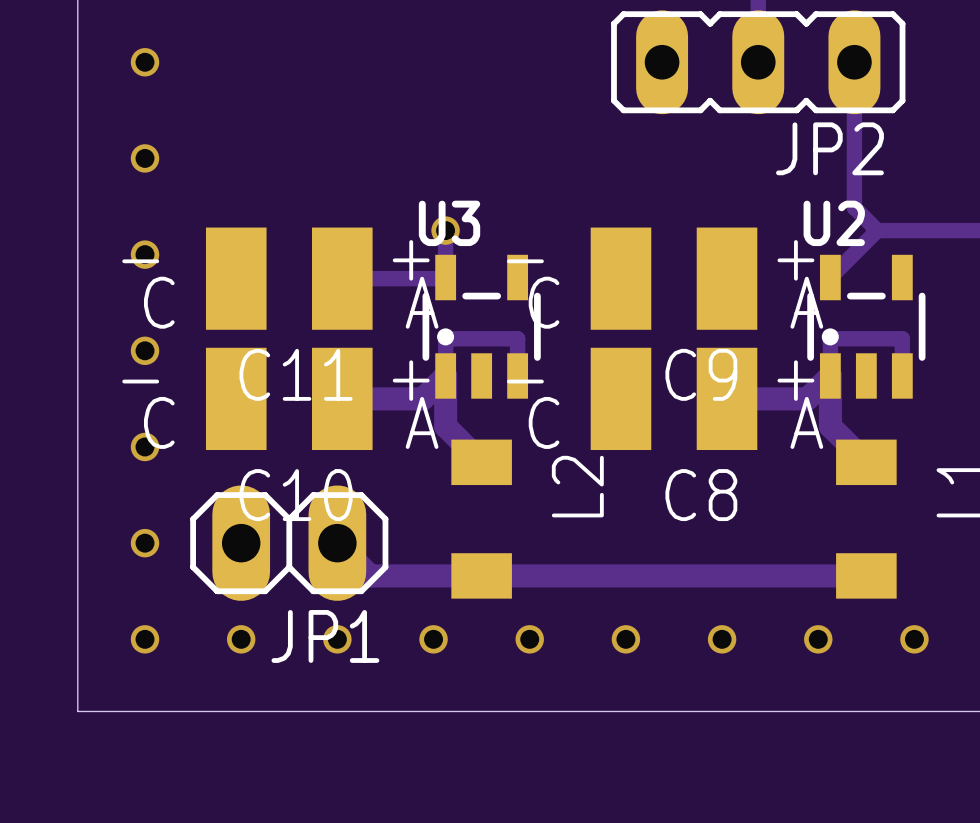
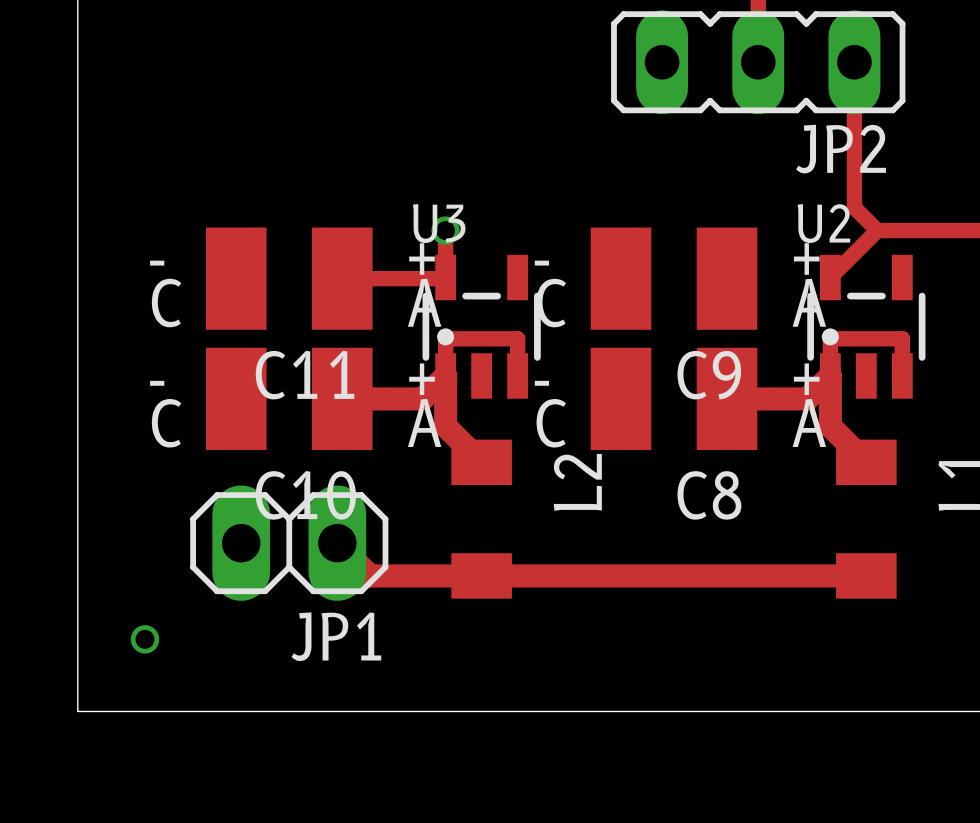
via: (145, 62) -> none
via: (145, 158) -> none
via: (145, 254) -> none
via: (145, 350) -> none
via: (145, 446) -> none
via: (145, 543) -> none
via: (241, 639) -> none
via: (337, 639) -> none
via: (433, 639) -> none
via: (529, 639) -> none
via: (625, 639) -> none
via: (722, 639) -> none
via: (818, 639) -> none
via: (914, 639) -> none

